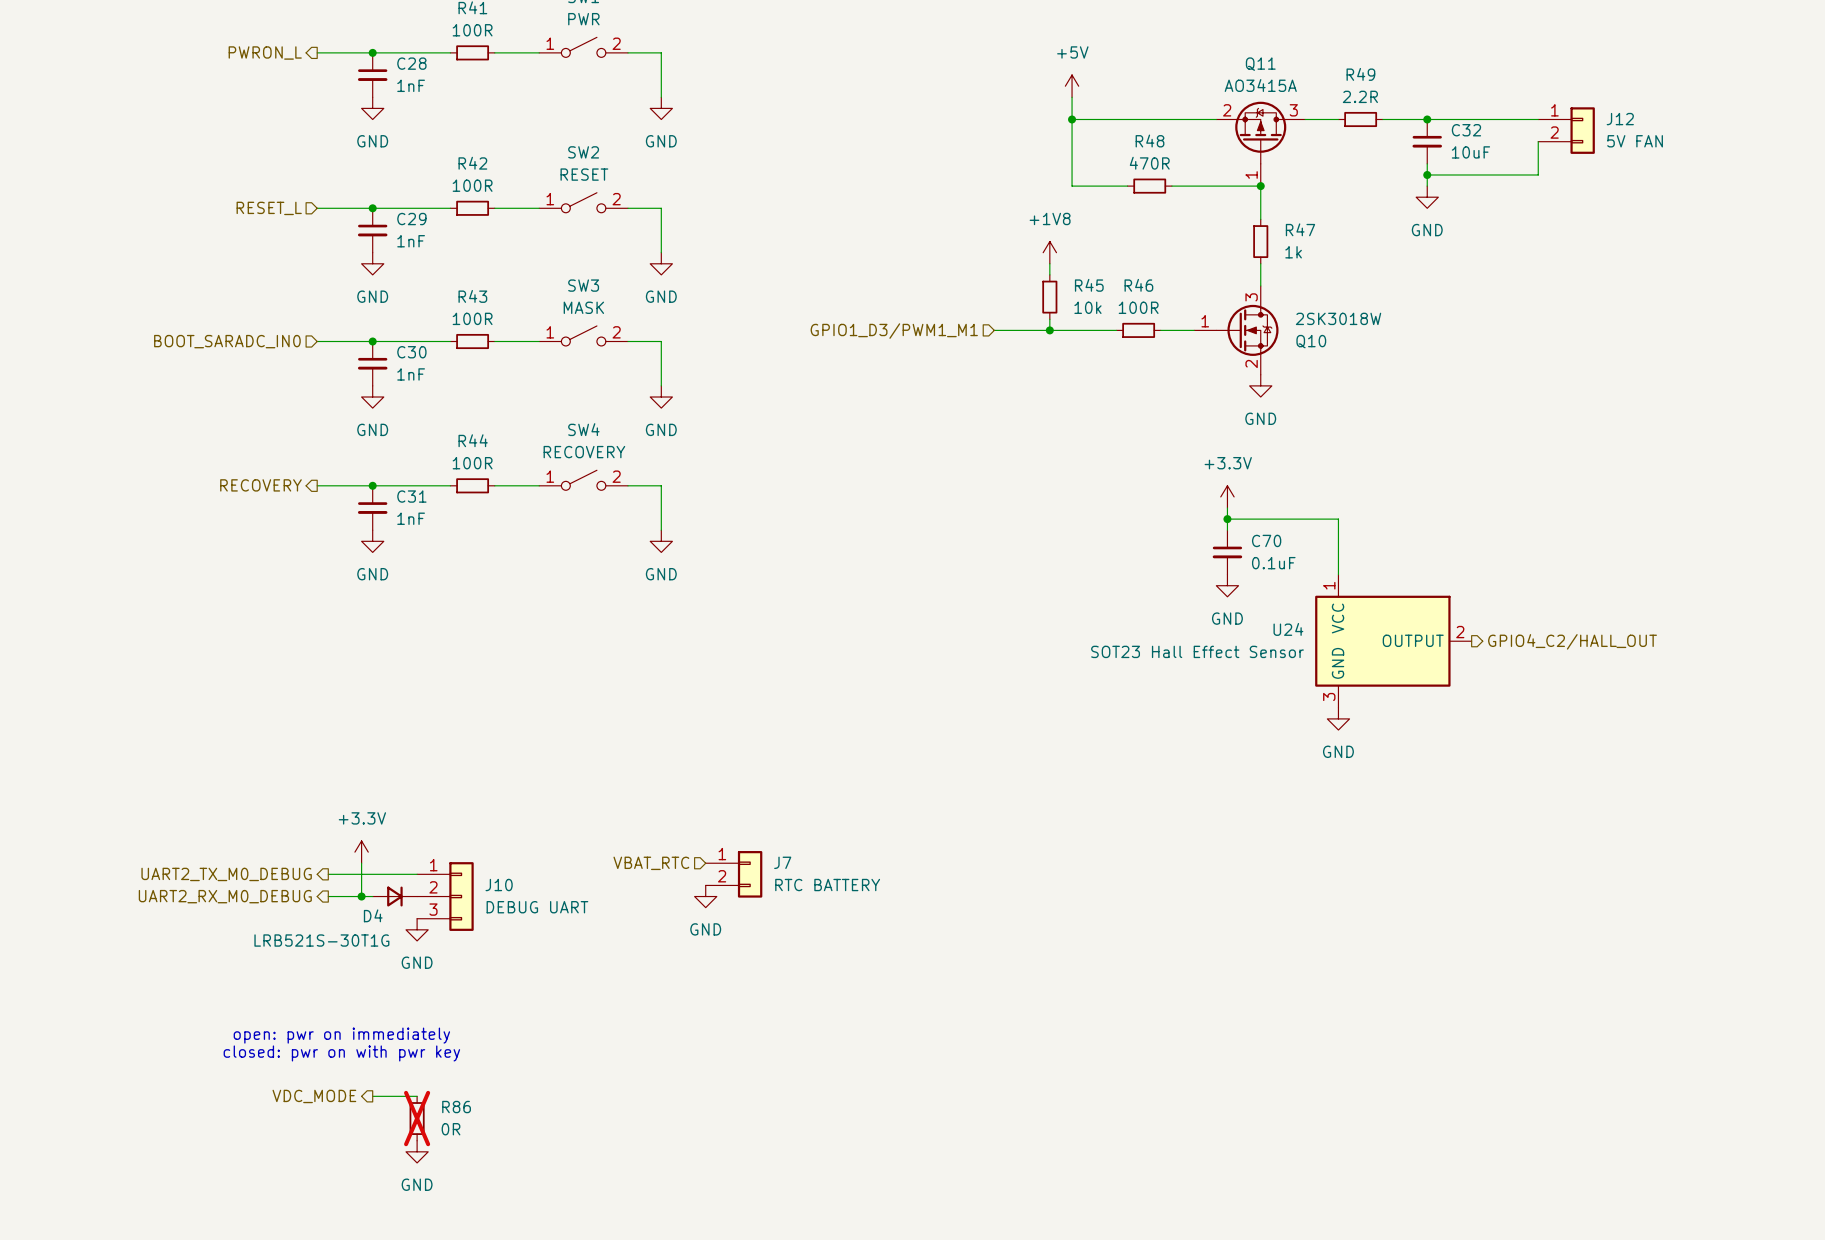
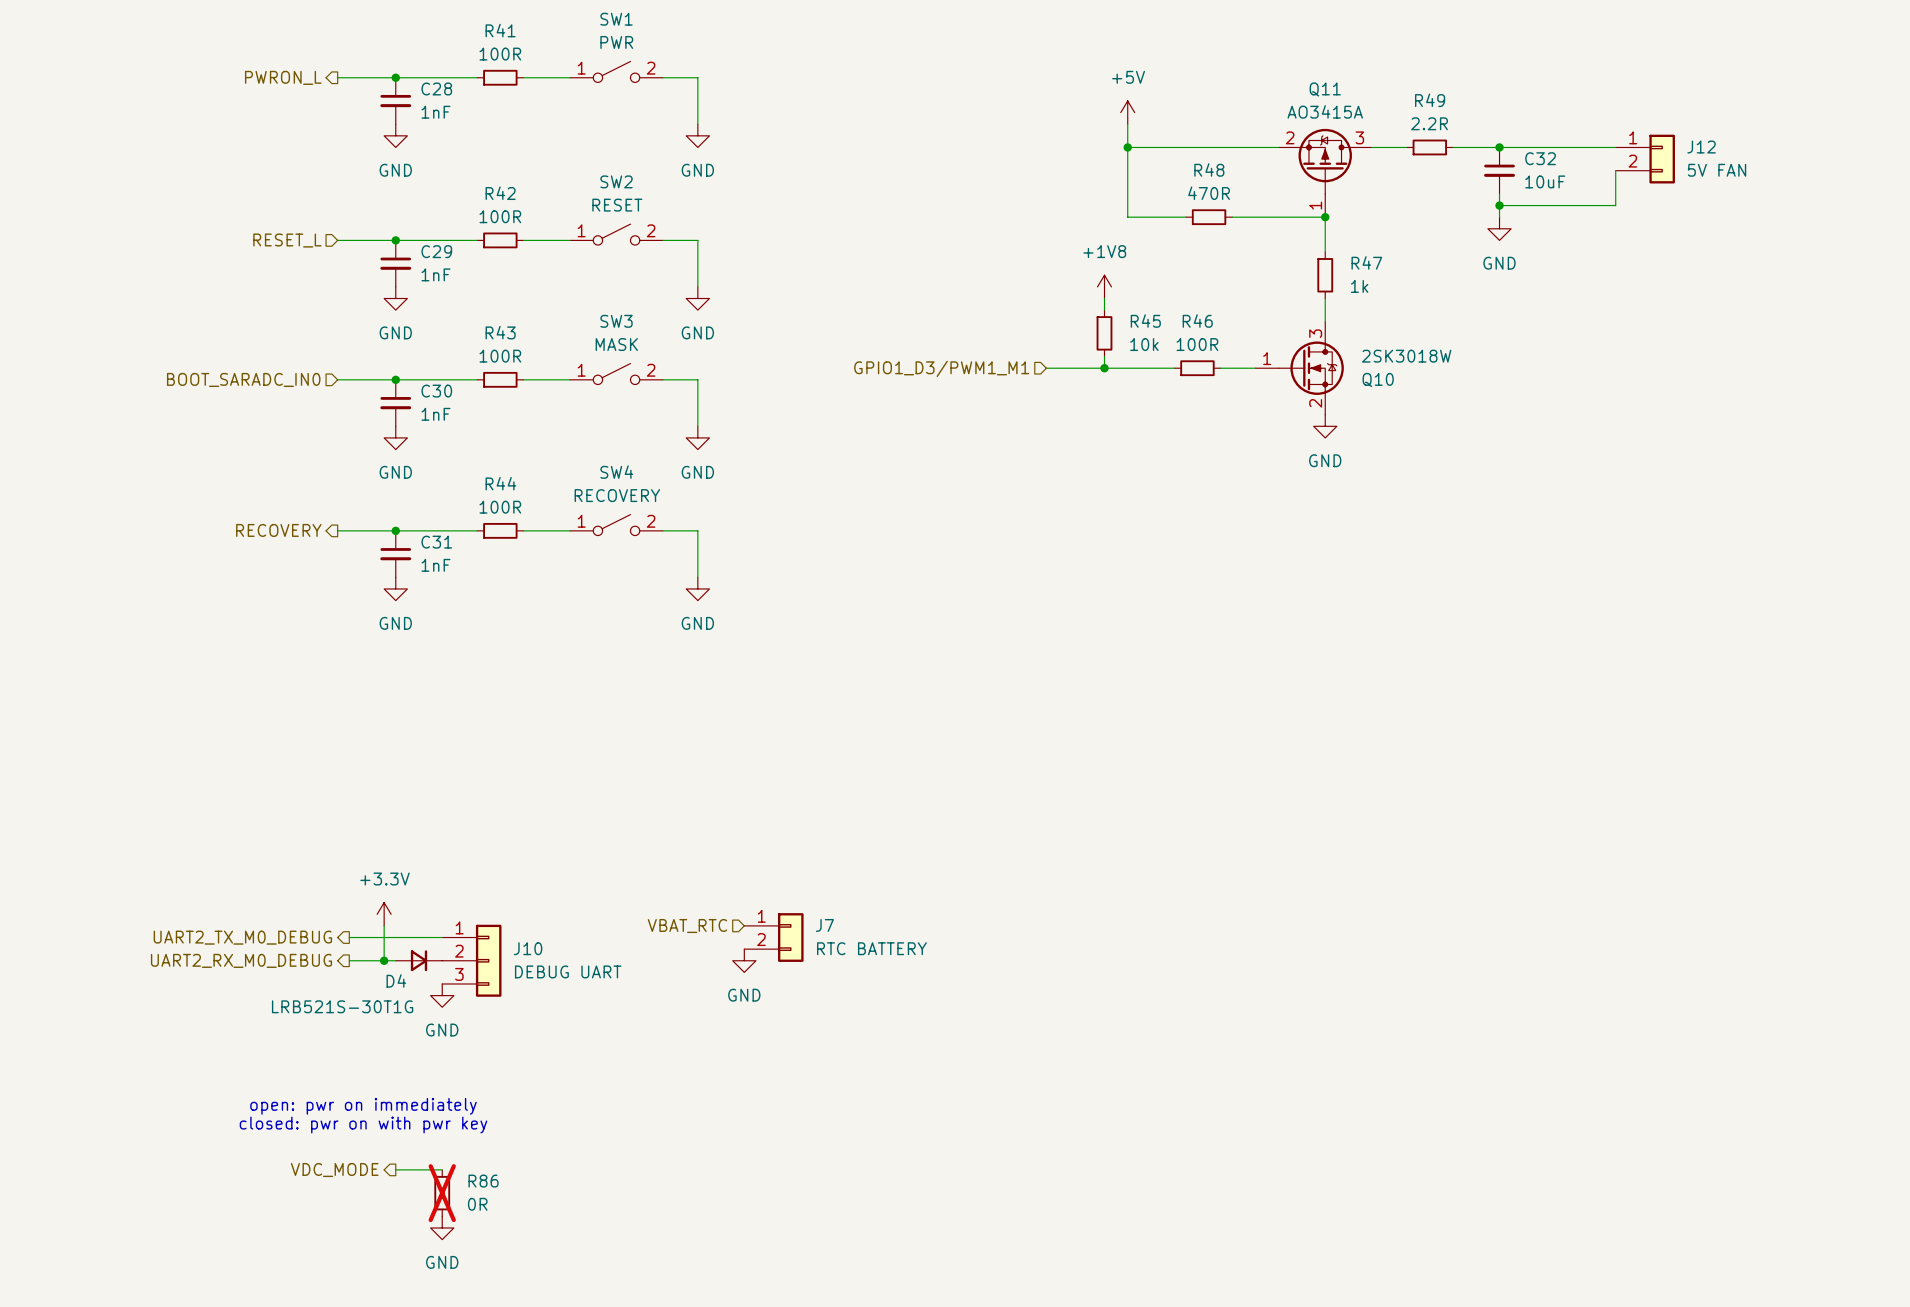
power symbol: +3.3V (1227, 496) -> none
wire: (1227, 508) (1227, 530) -> none
wire: (1227, 519) (1338, 519) (1338, 574) -> none
junction: (1227, 519) -> none
C70: 0.1uF (1227, 552) -> none
power symbol: GND (1227, 585) -> none
U24: SOT23 Hall Effect Sensor (1393, 641) -> none
hierarchical label: GPIO4_C2/HALL_OUT (1572, 641) -> none
power symbol: GND (1338, 718) -> none

